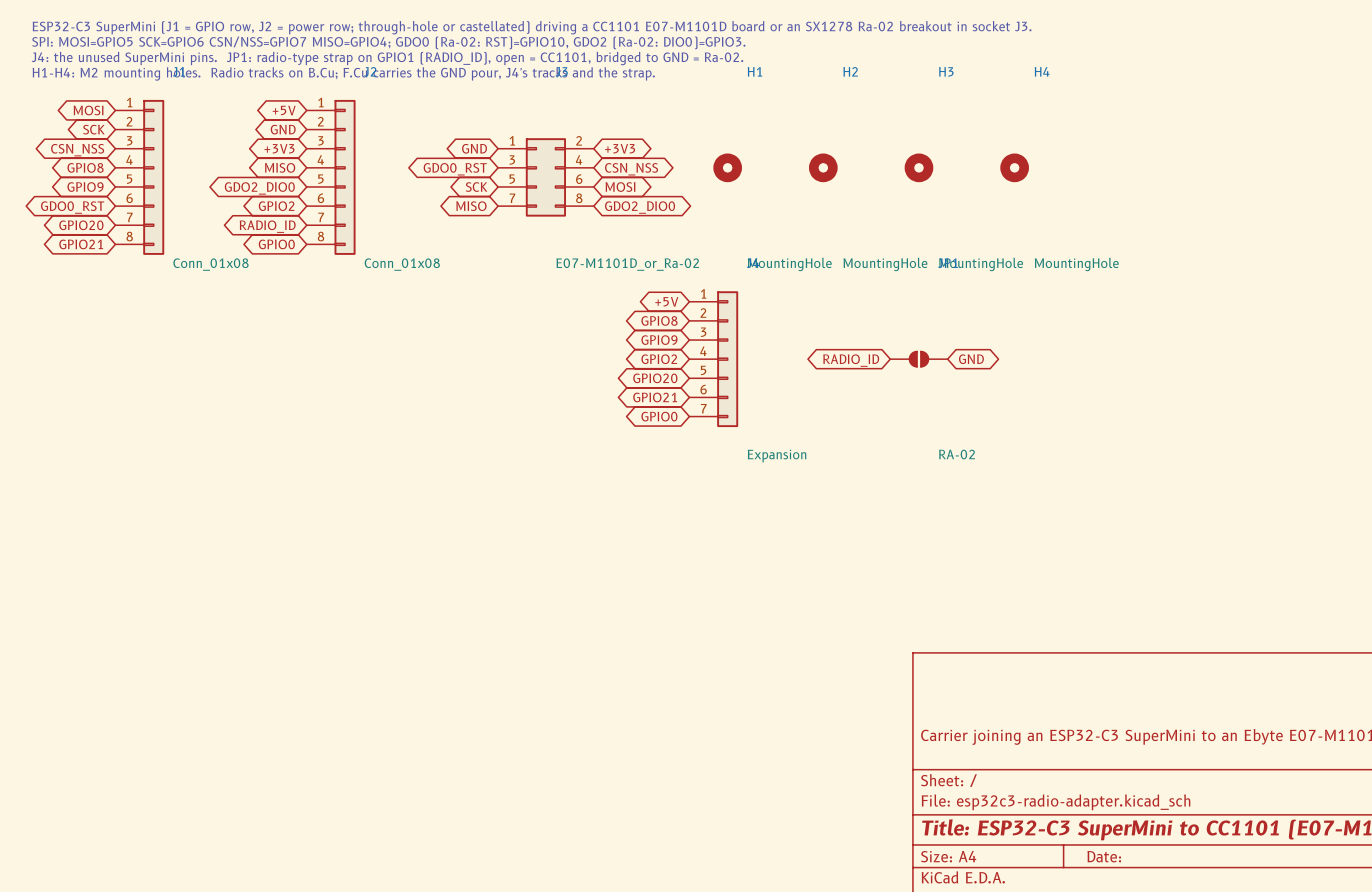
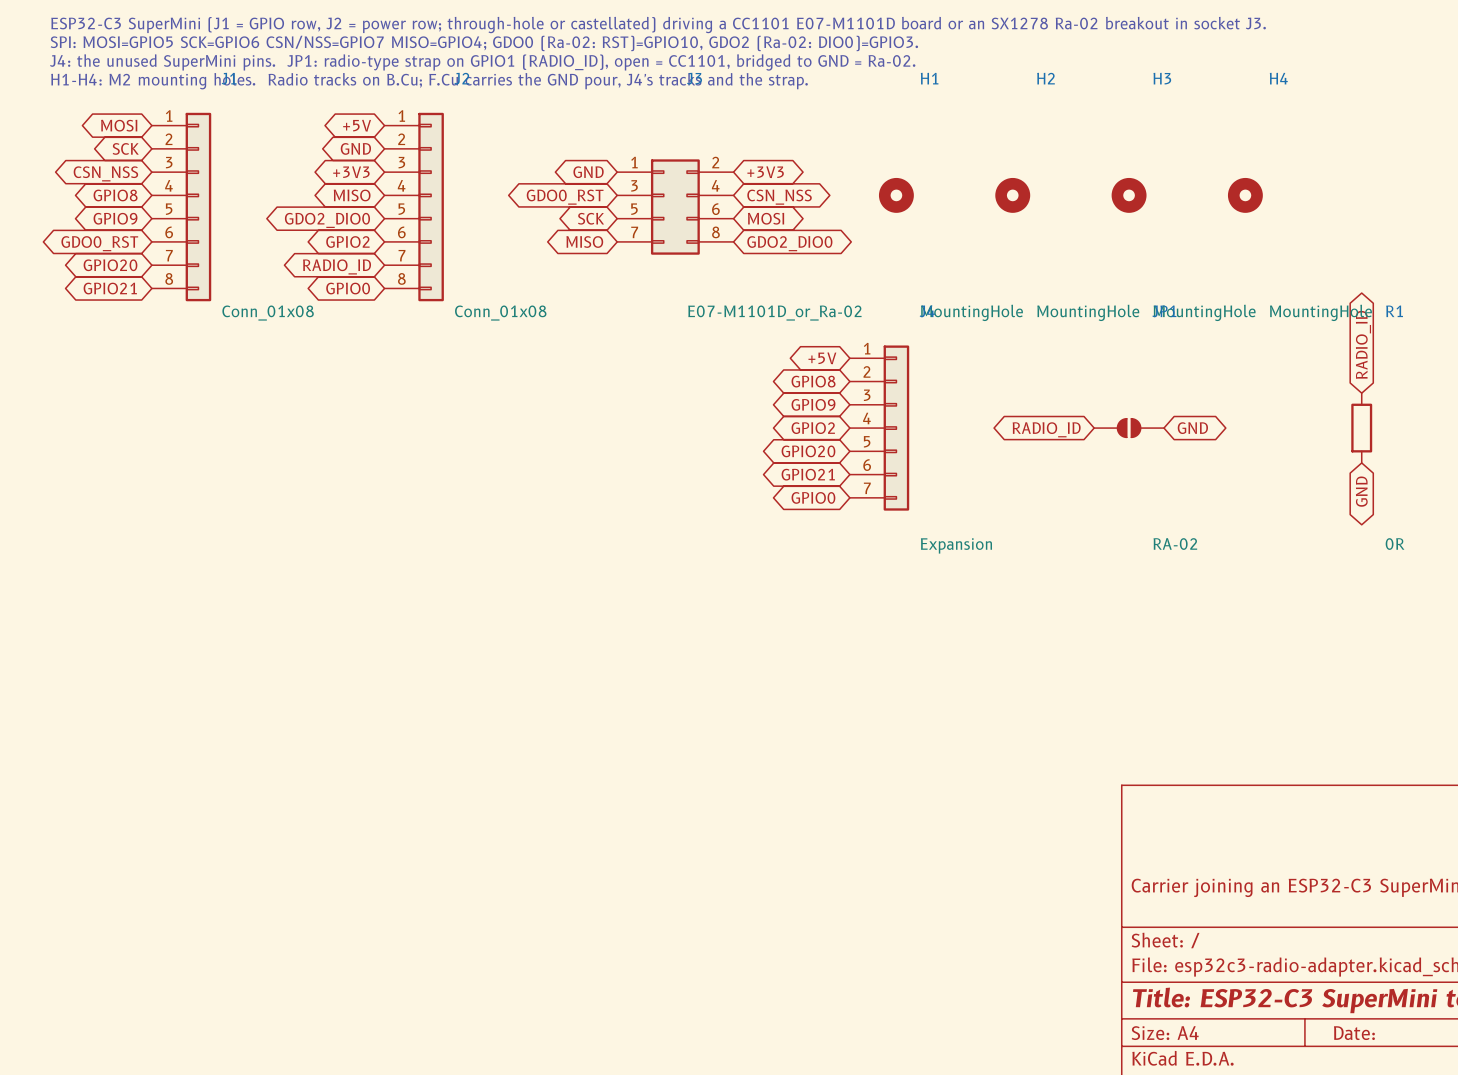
global label: none -> RADIO_ID (1363, 344)
R1: none -> 0R (1361, 428)
global label: none -> GND (1361, 491)

